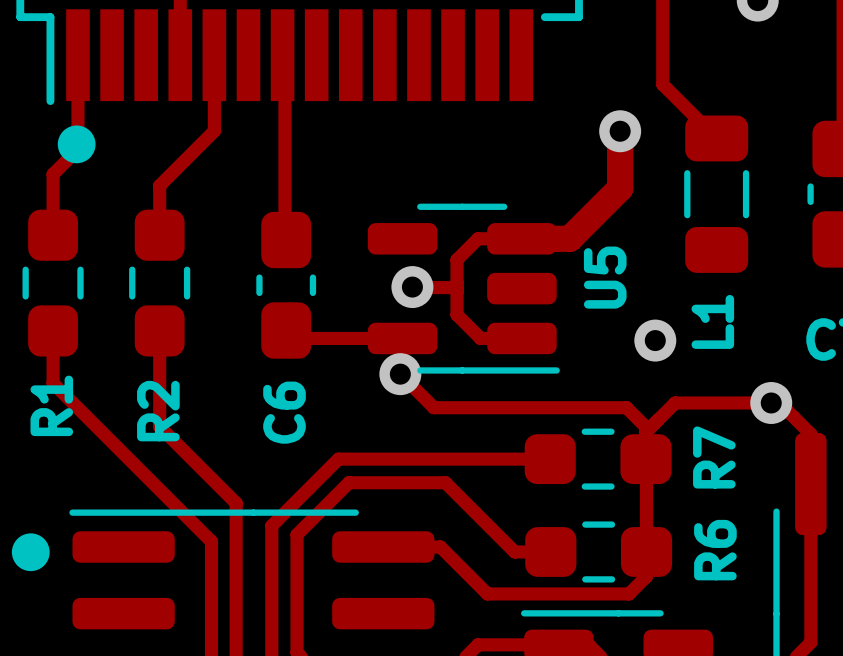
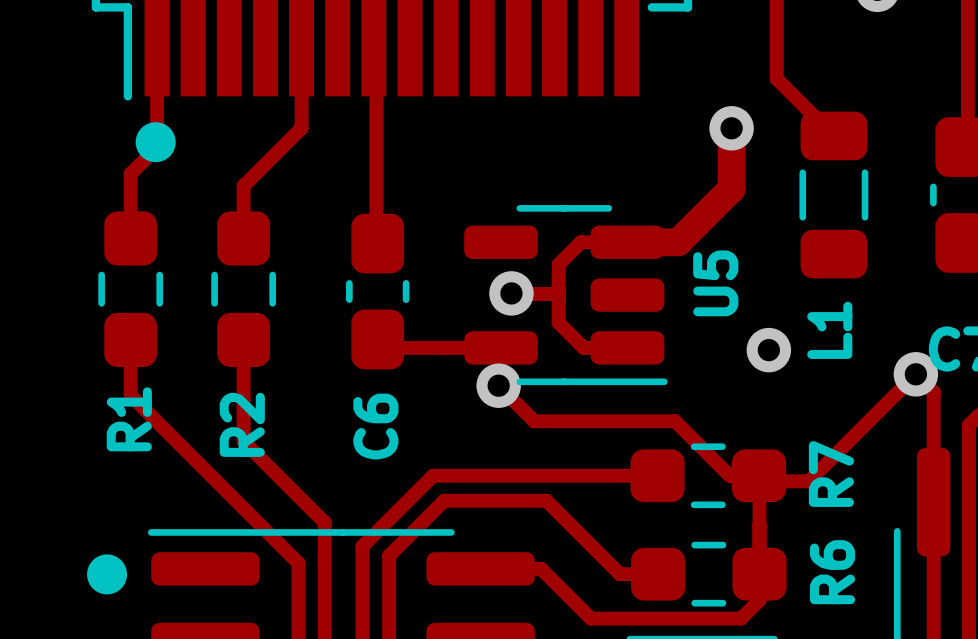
via position: (771, 402) -> (915, 374)
track: (566, 407) (626, 407) (645, 427) (645, 459) -> (675, 421) (729, 475) (758, 475)
track: (657, 420) (645, 432) (675, 402) (779, 402) (810, 434) -> (759, 476) (764, 481) (808, 481) (915, 374) (933, 392) (933, 449)

